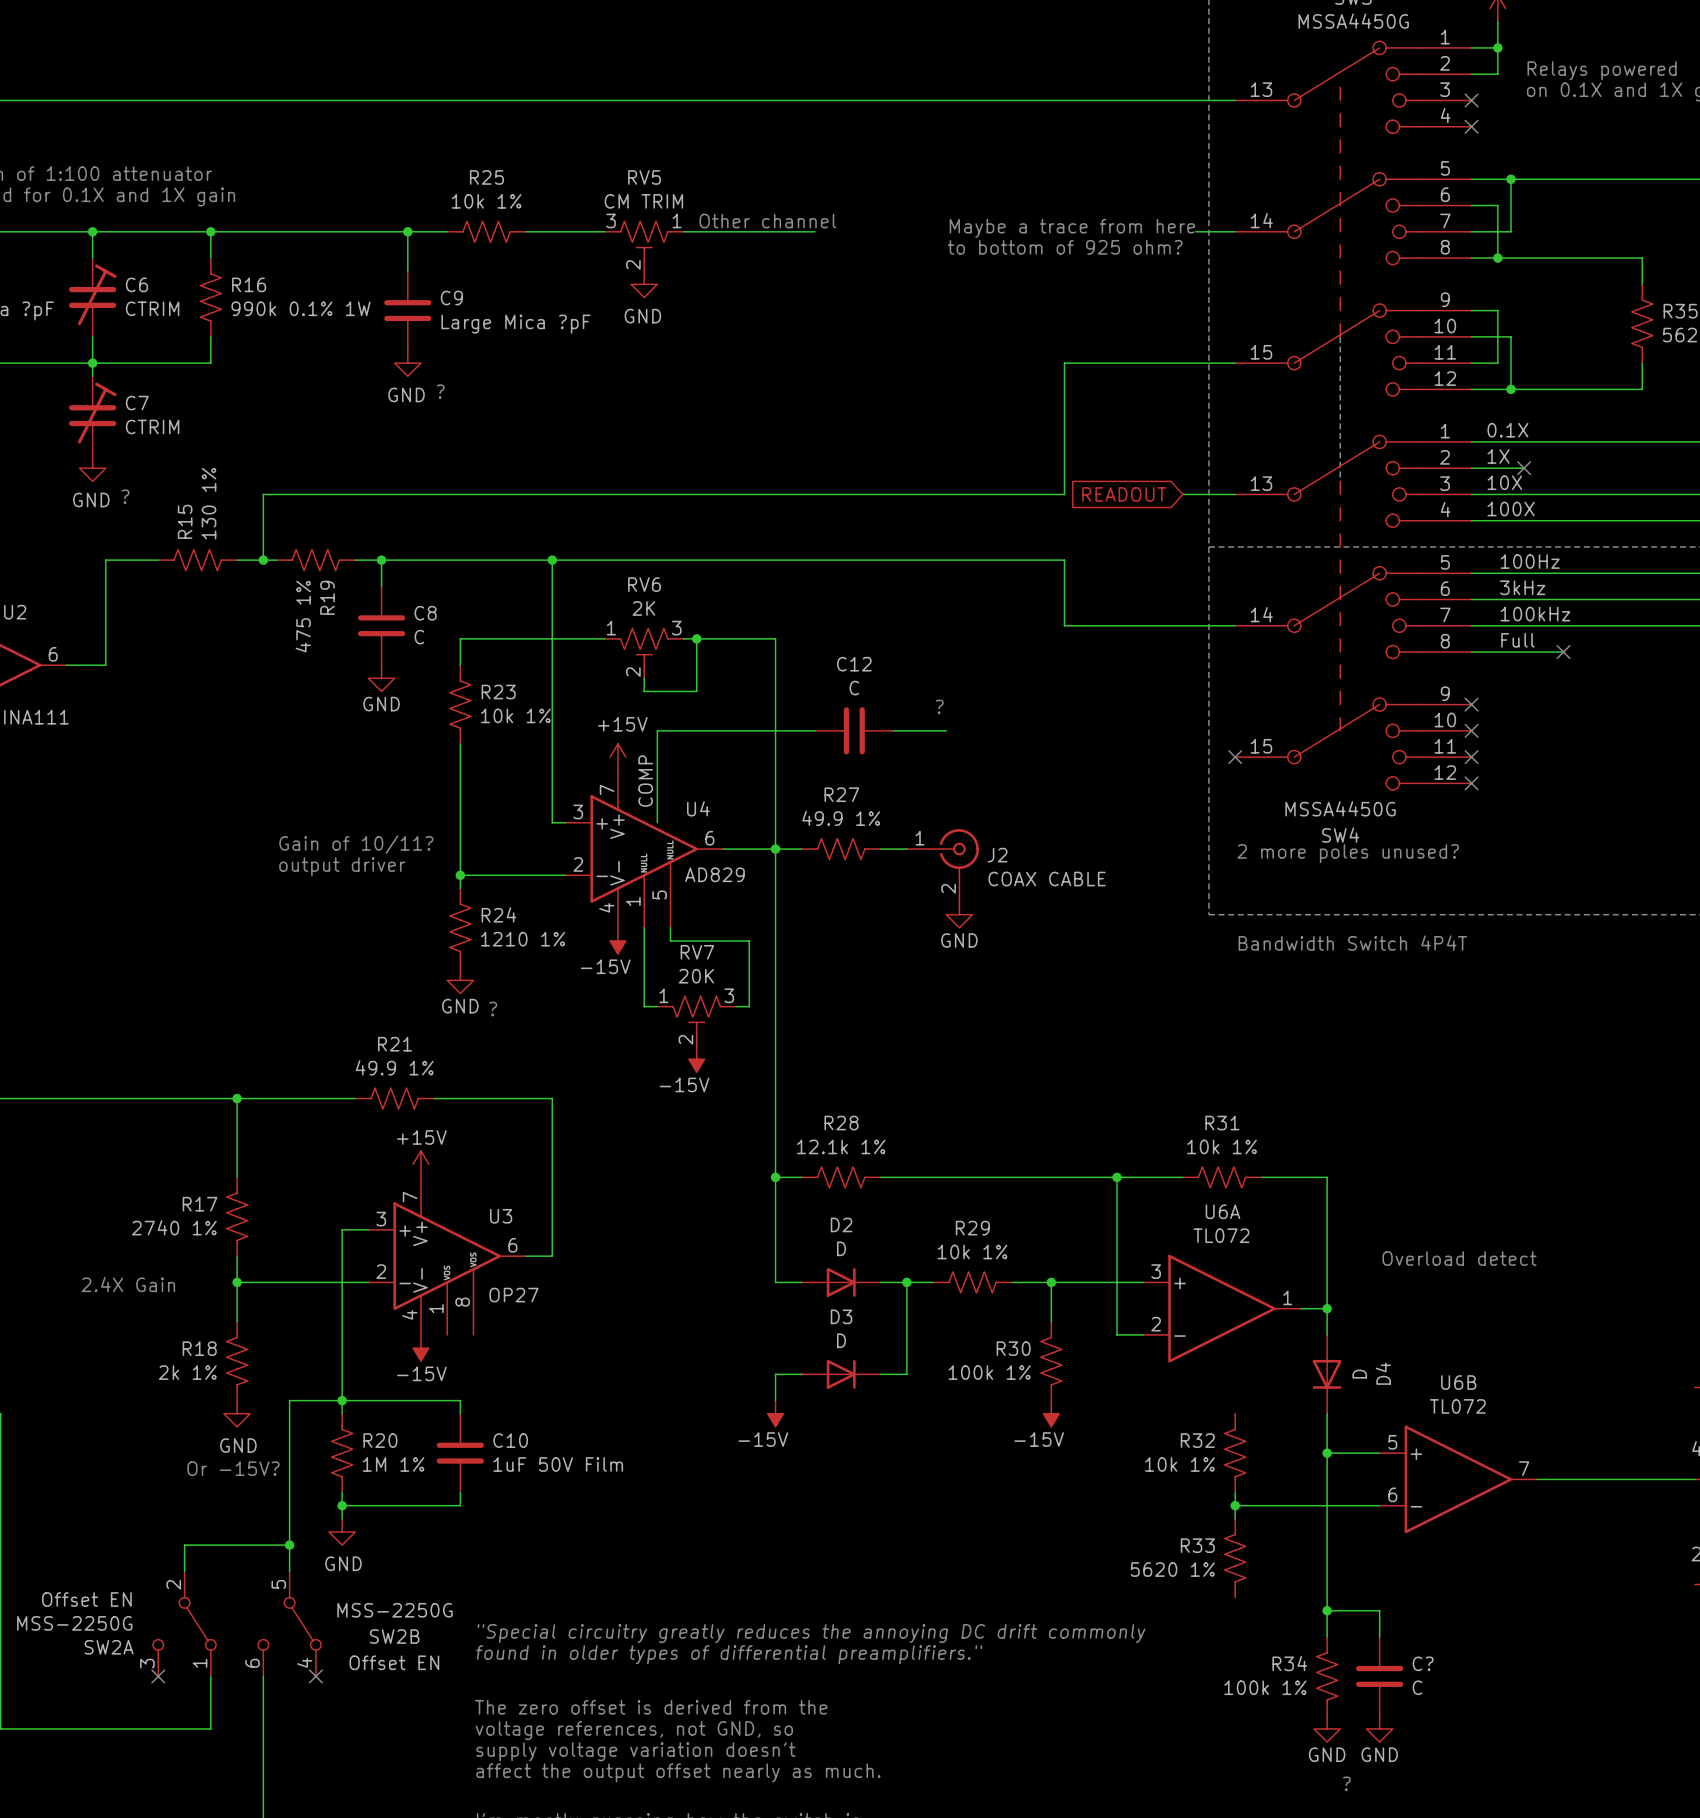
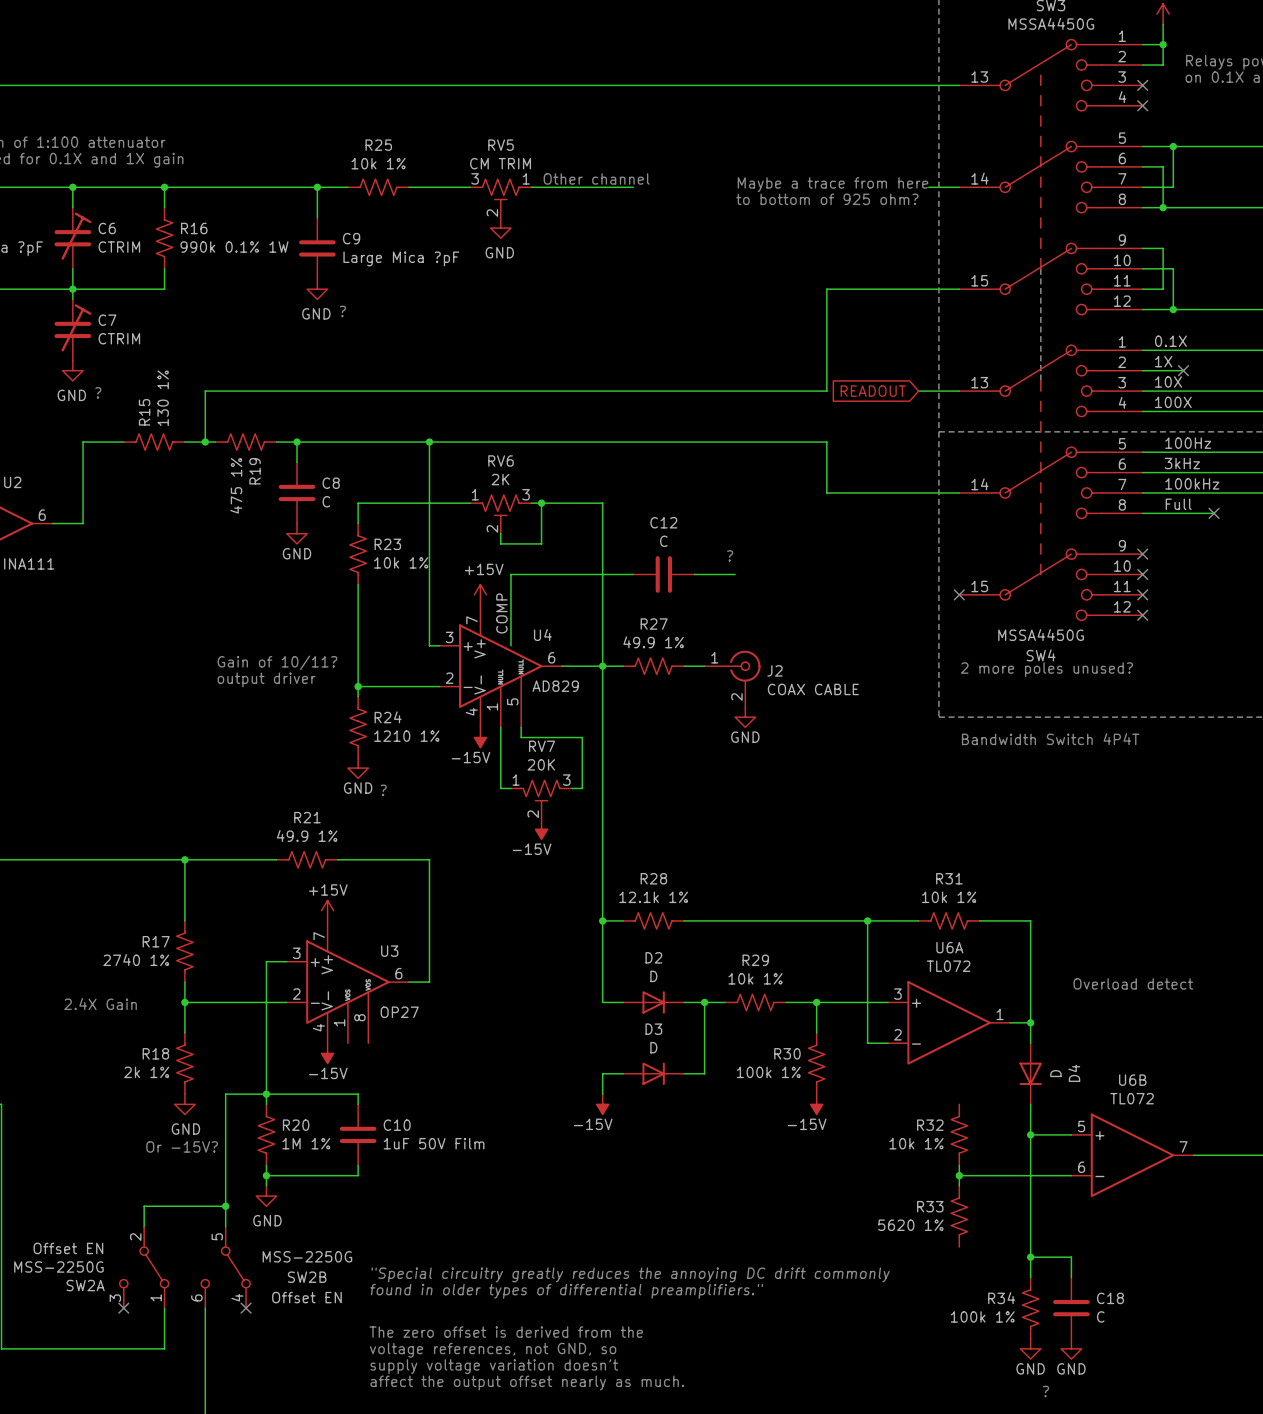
C? name: C? (1423, 1663) -> C18 (1110, 1298)

